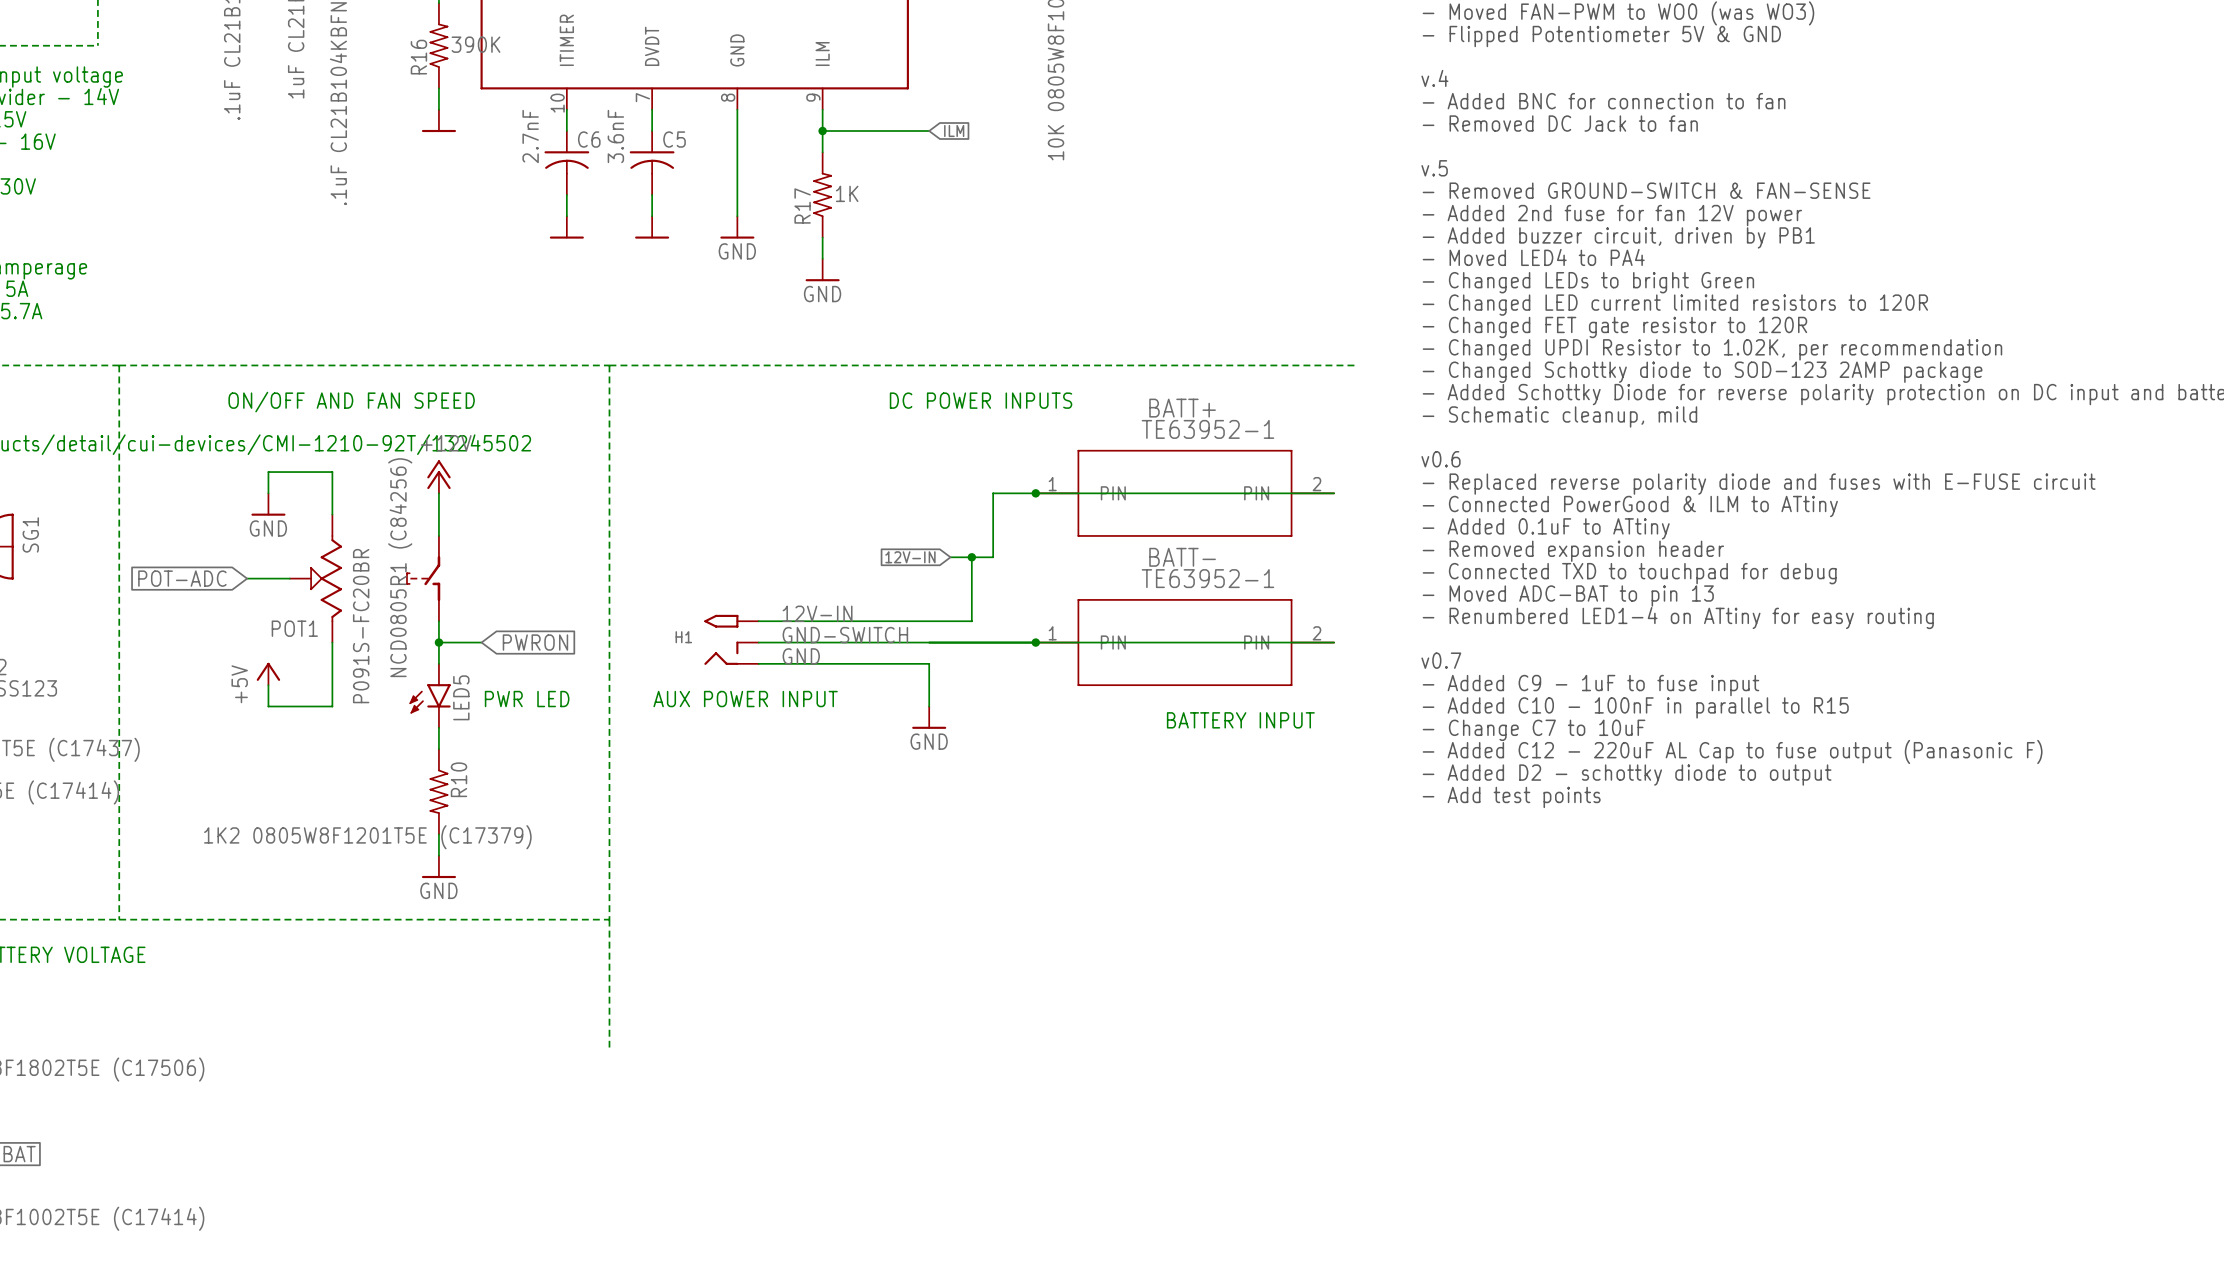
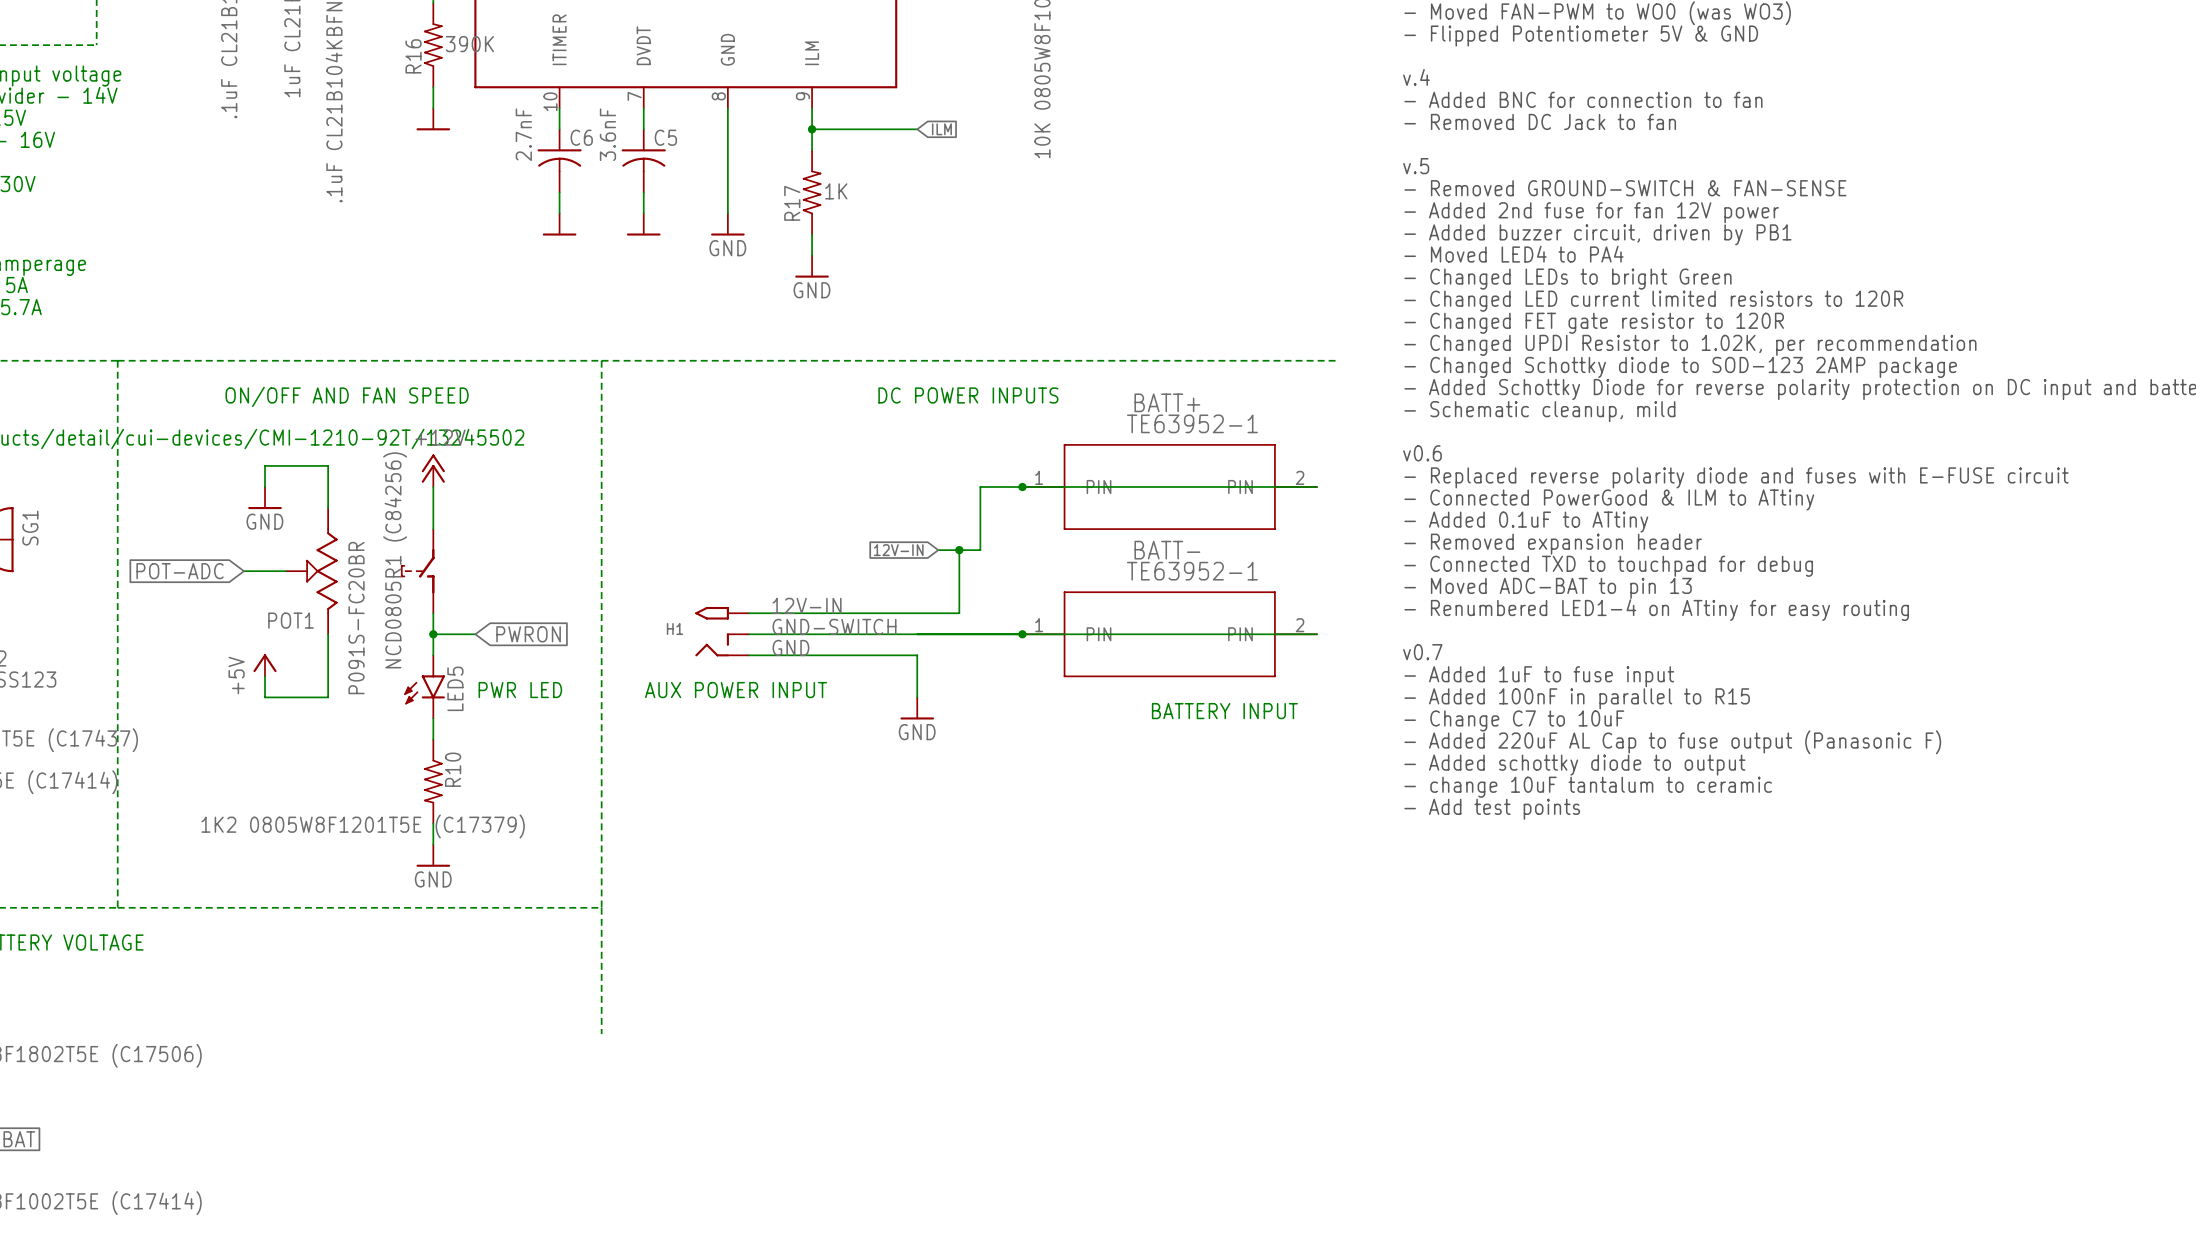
text: - Added C9 - 1uF to fuse input (1590, 685) -> - Added 1uF to fuse input (1539, 676)
text: - Added C10 - 100nF in parallel to R15 (1635, 707) -> - Added 100nF in parallel to R15 (1577, 698)
text: - Added C12 - 220uF AL Cap to fuse output (Panasonic F) (1732, 751) -> - Added 220uF AL Cap to fuse output (Panasonic F) (1672, 742)
text: - Added D2 - schottky diode to output (1627, 775) -> - Added schottky diode to output (1574, 765)
text: - Add test points (1511, 797) -> - change 10uF tantalum to ceramic (1588, 787)
text: none -> - Add test points (1492, 809)

